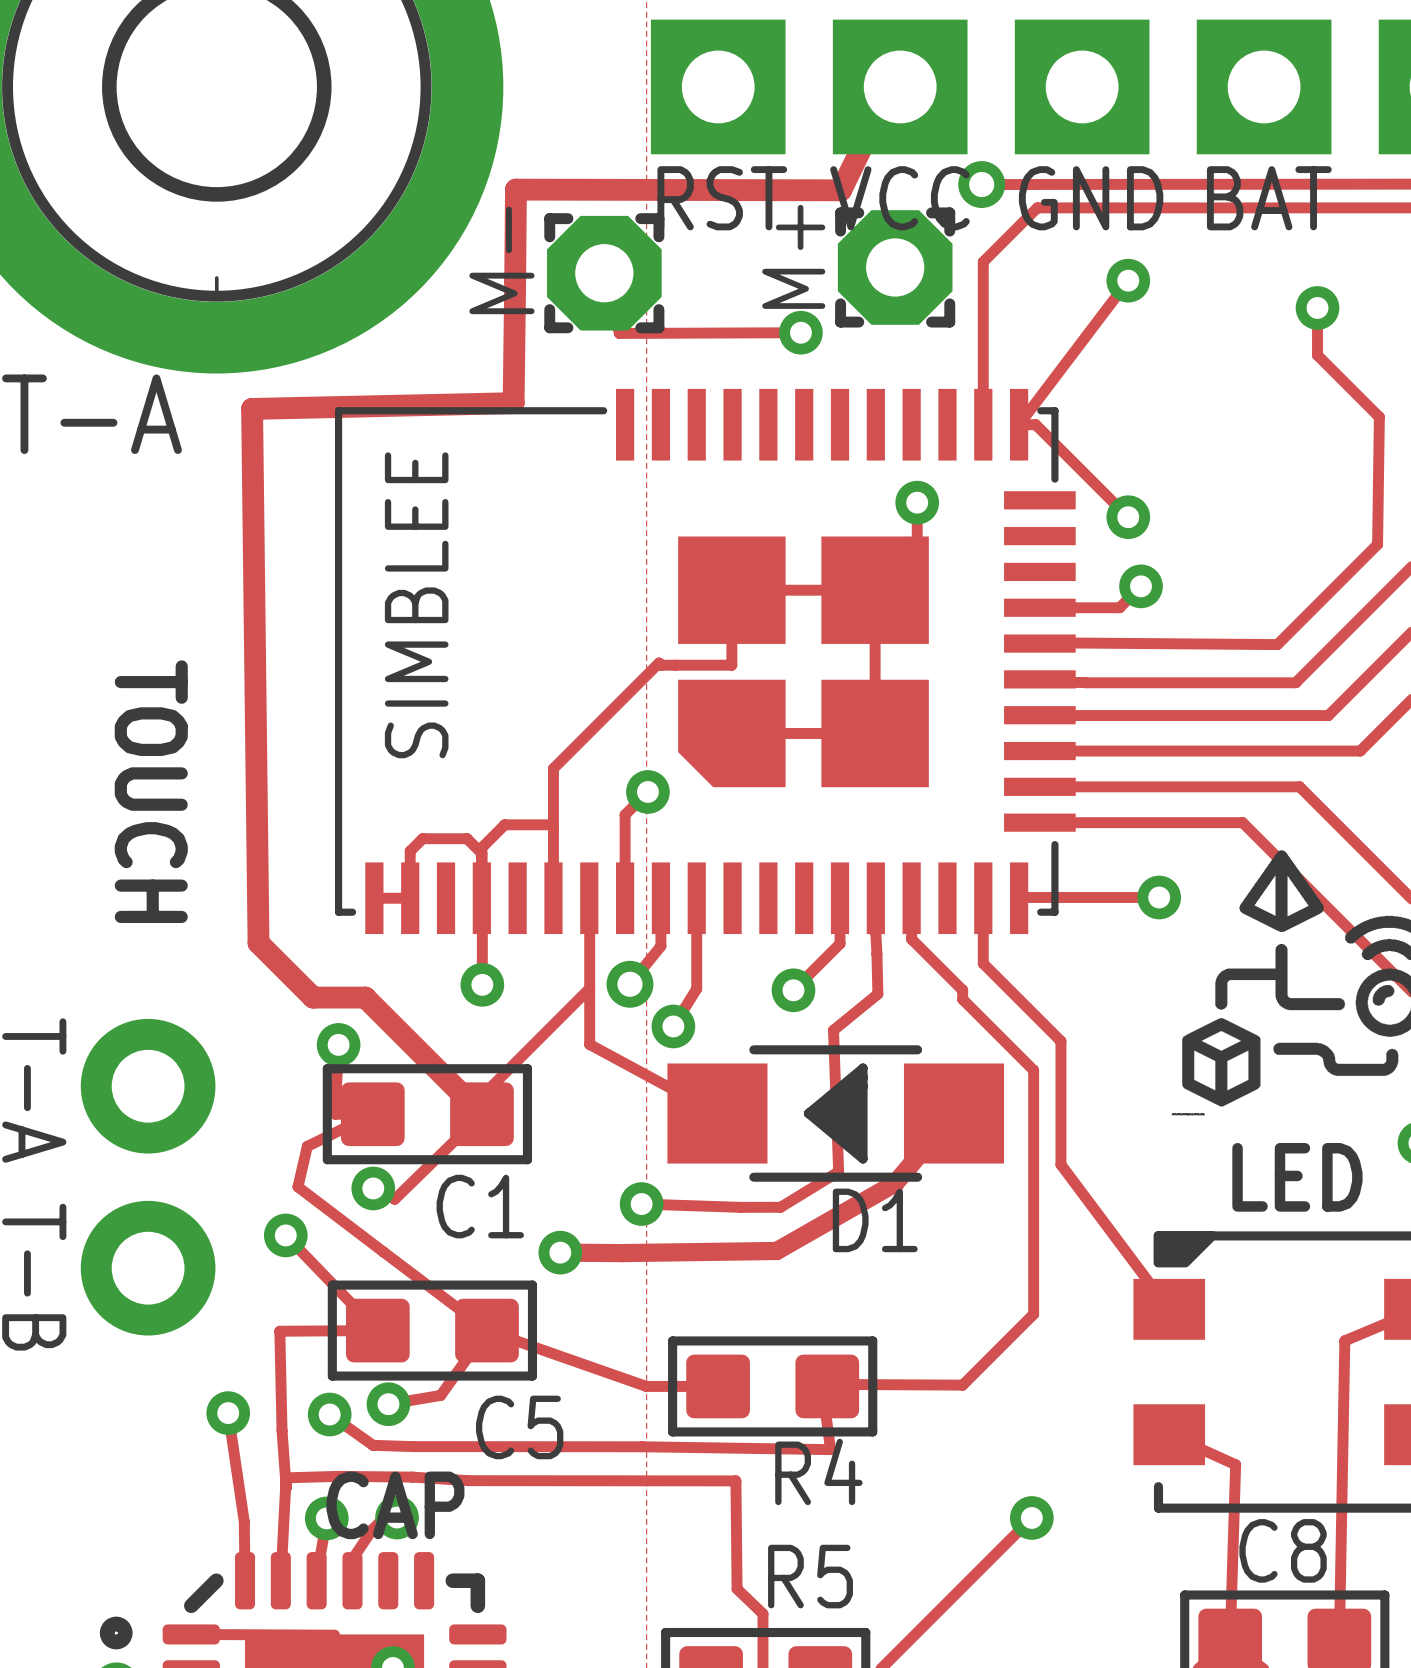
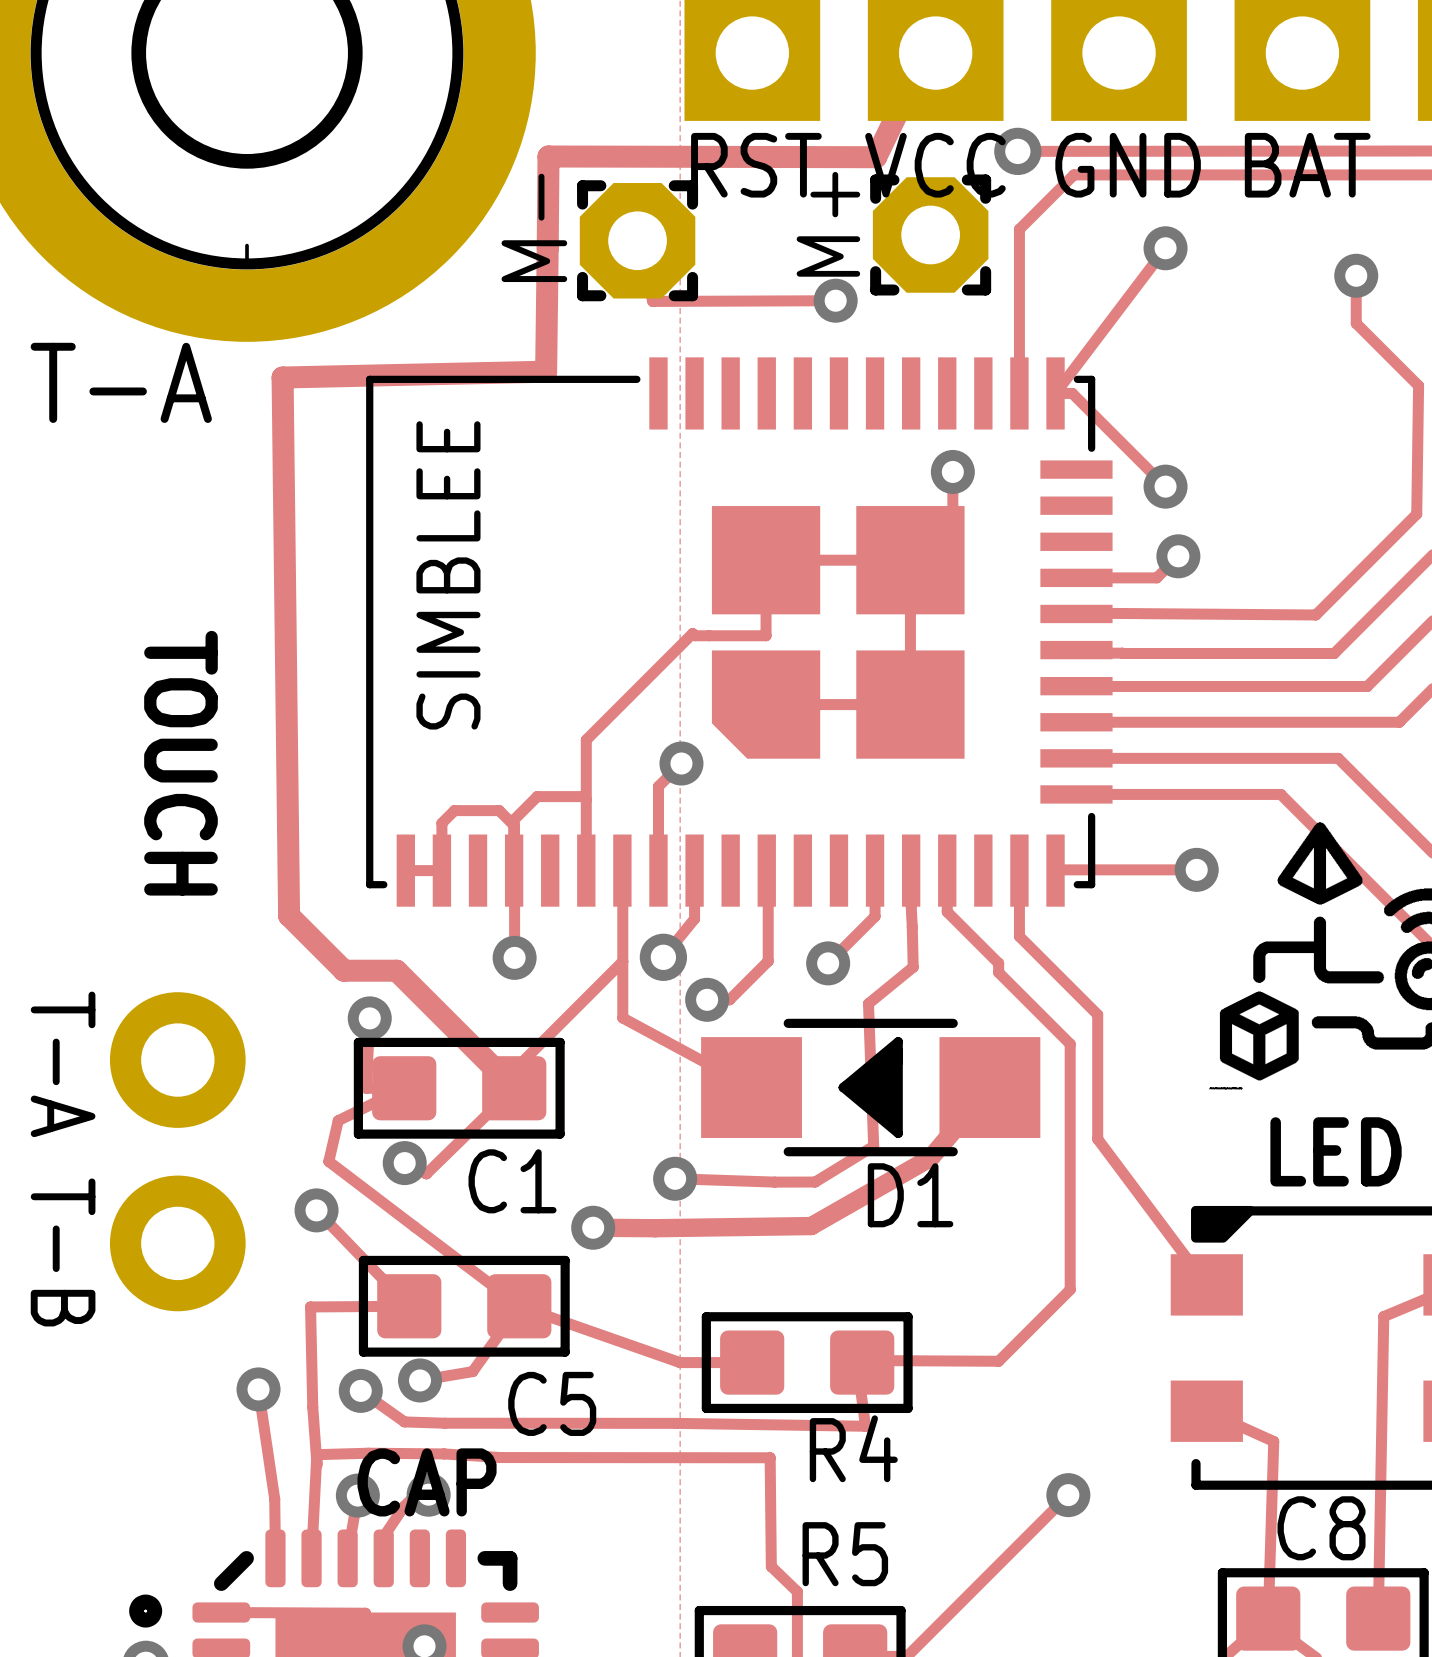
track: (696, 898) (696, 988) (673, 1026) -> (766, 870) (768, 961) (729, 999) (707, 999)

